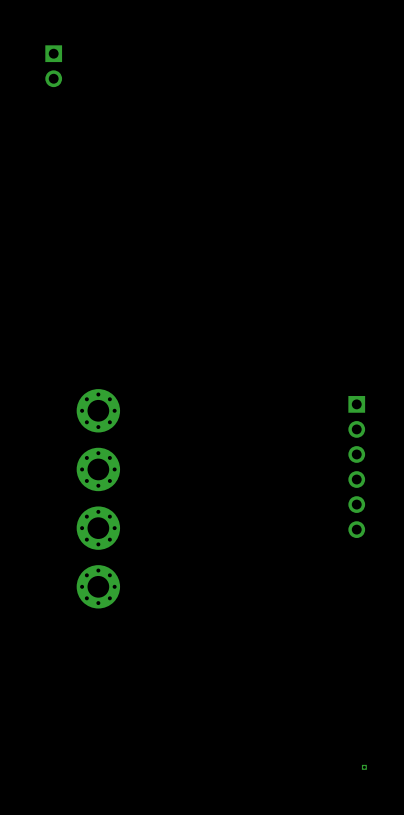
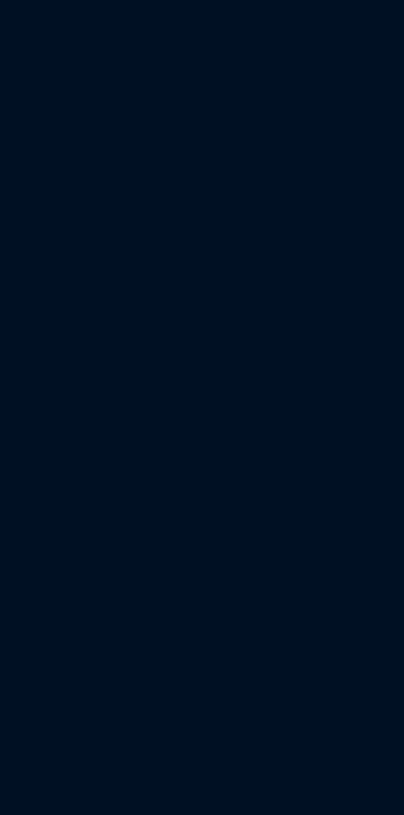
part: (53, 66) -> none
part: (98, 410) -> none
part: (356, 466) -> none
part: (98, 469) -> none
part: (98, 528) -> none
part: (98, 586) -> none
part: (364, 767) -> none

